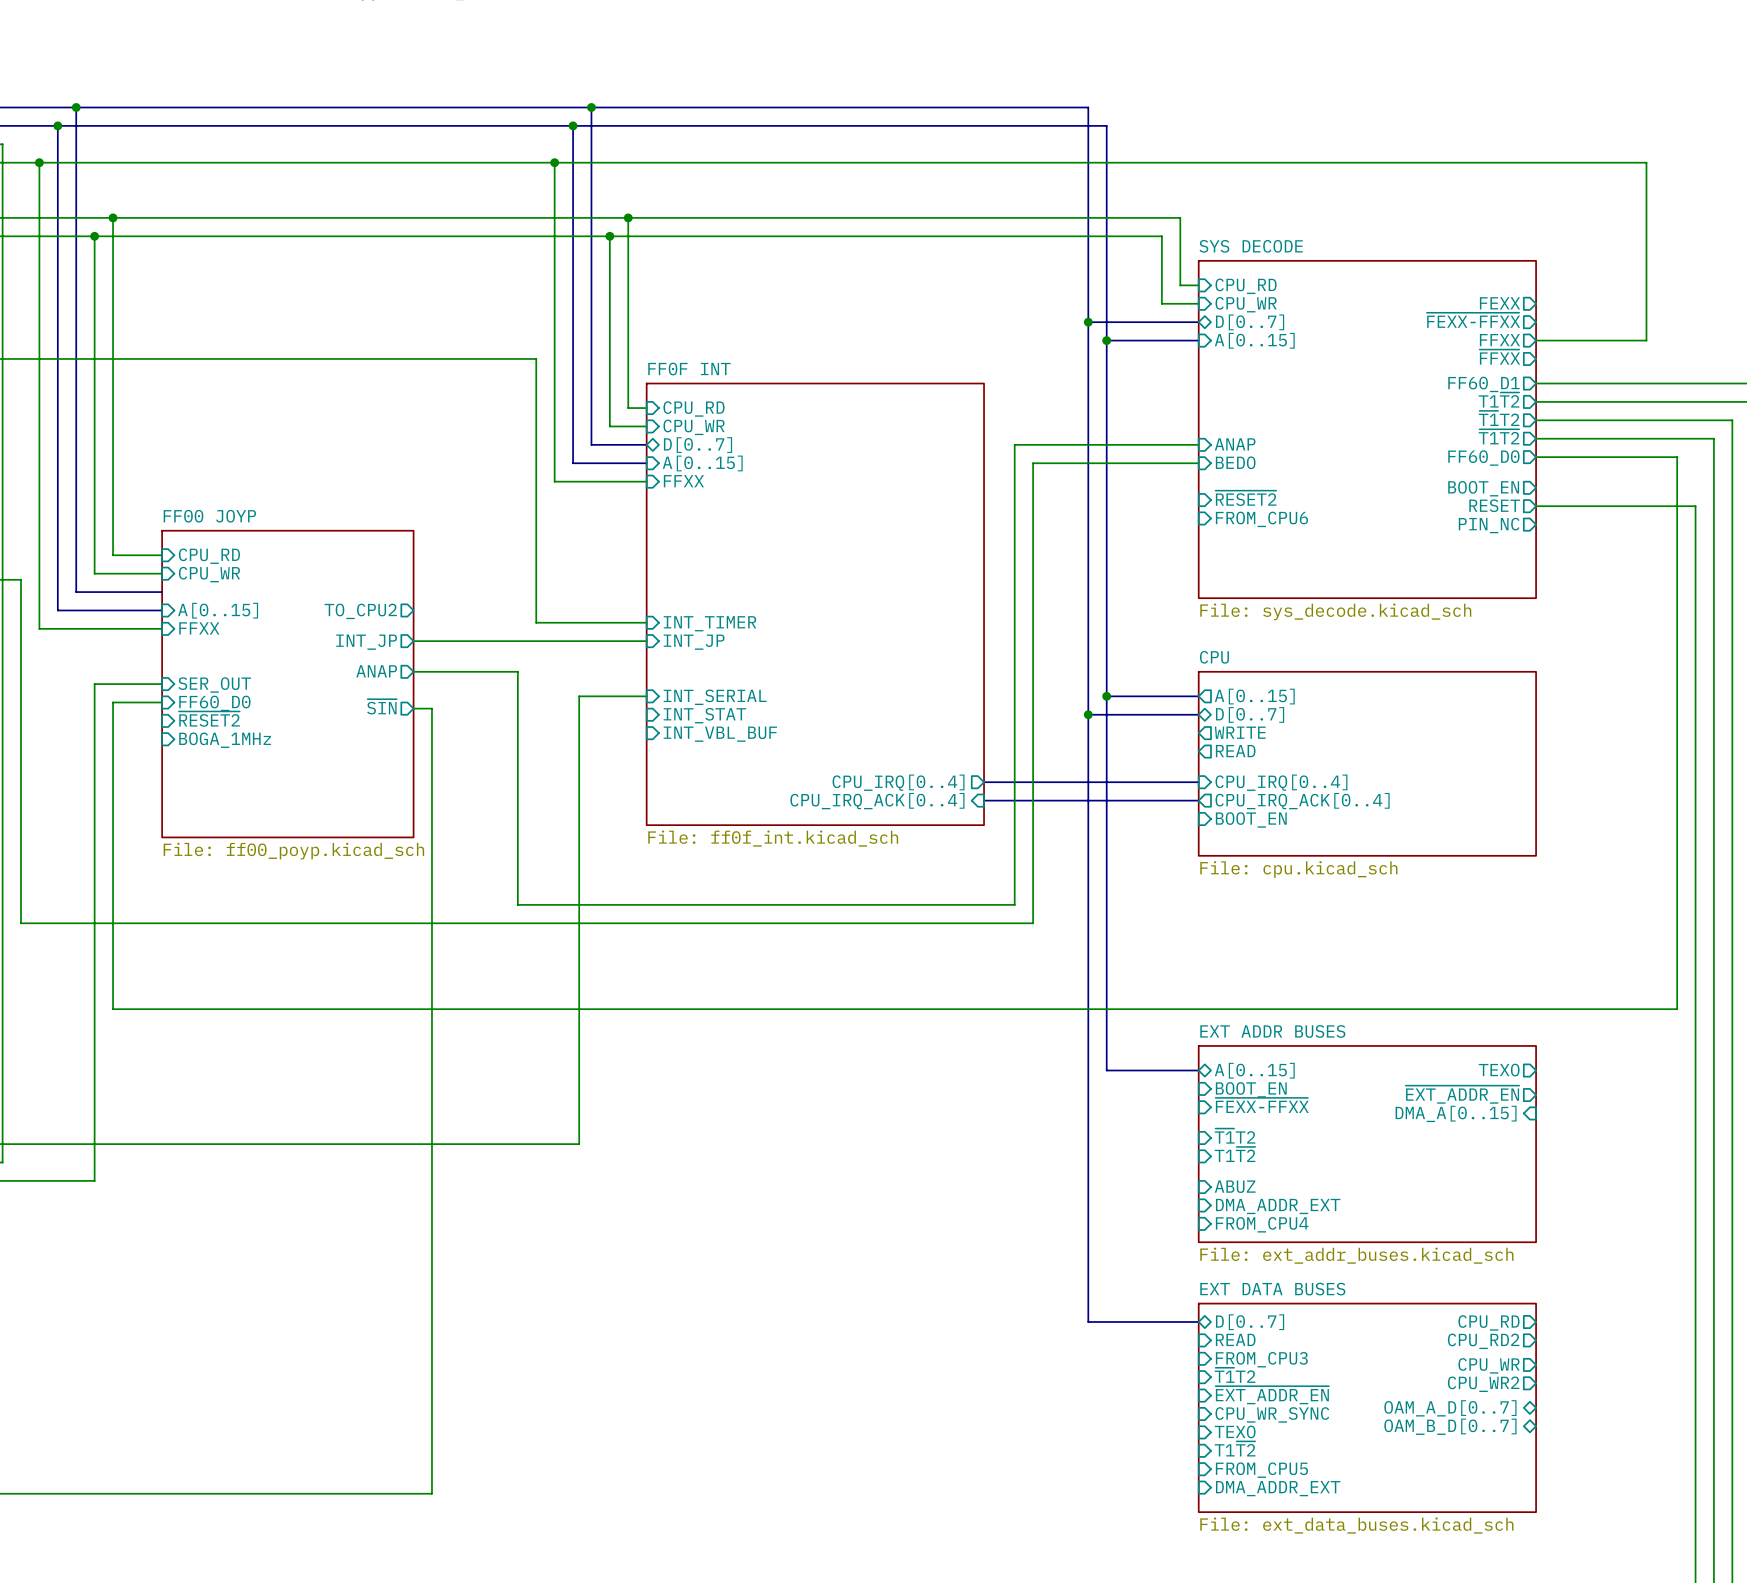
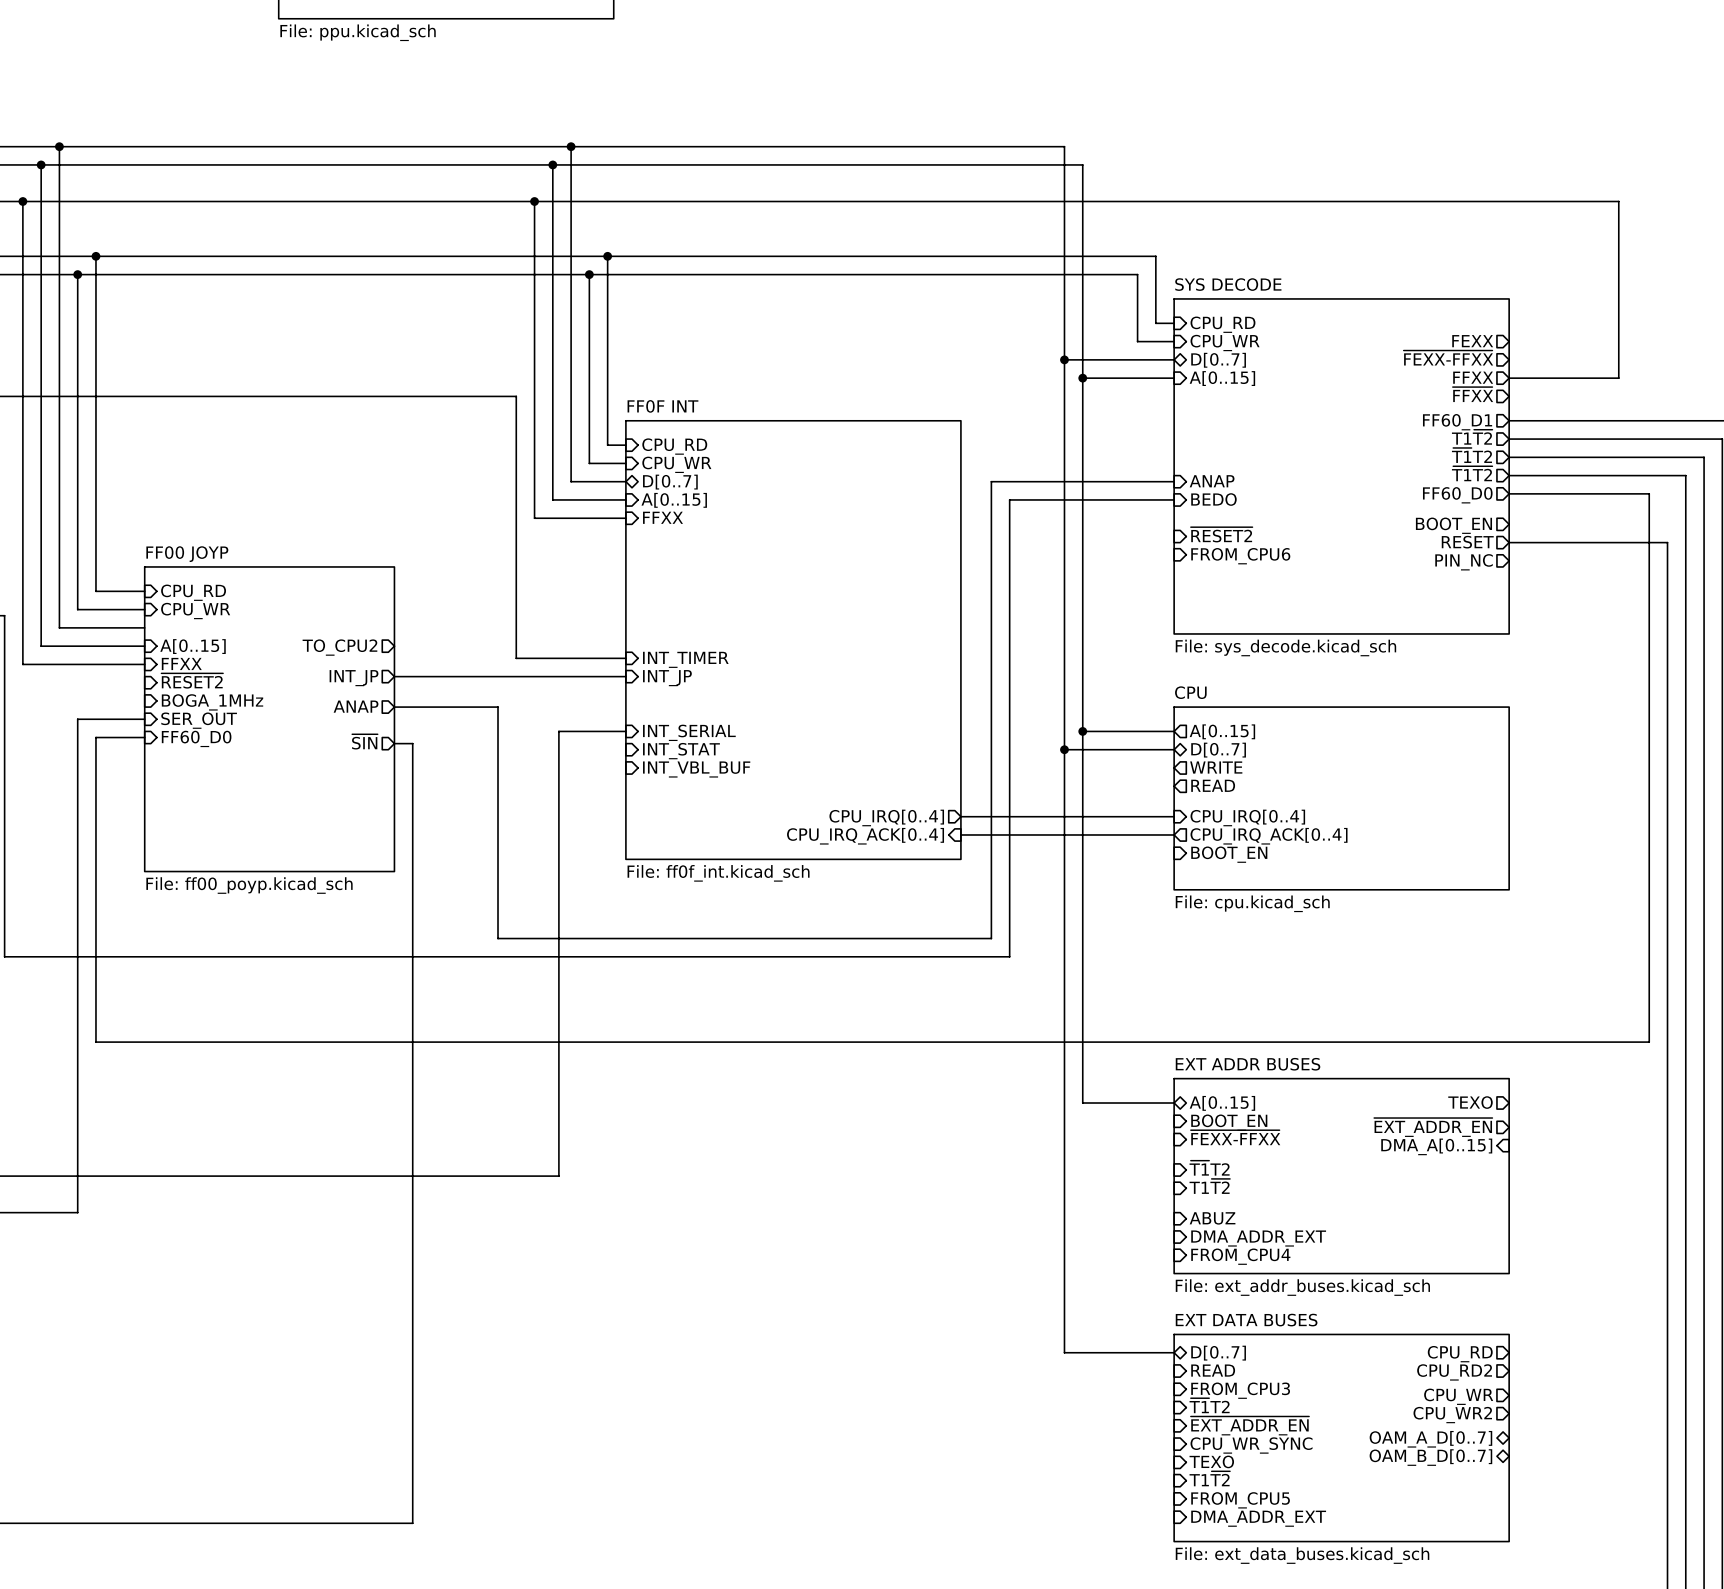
sheet pin position: ~{RESET2} (209, 719) -> ~{RESET2} (192, 680)
sheet pin position: BOGA_1MHz (225, 740) -> BOGA_1MHz (212, 702)

